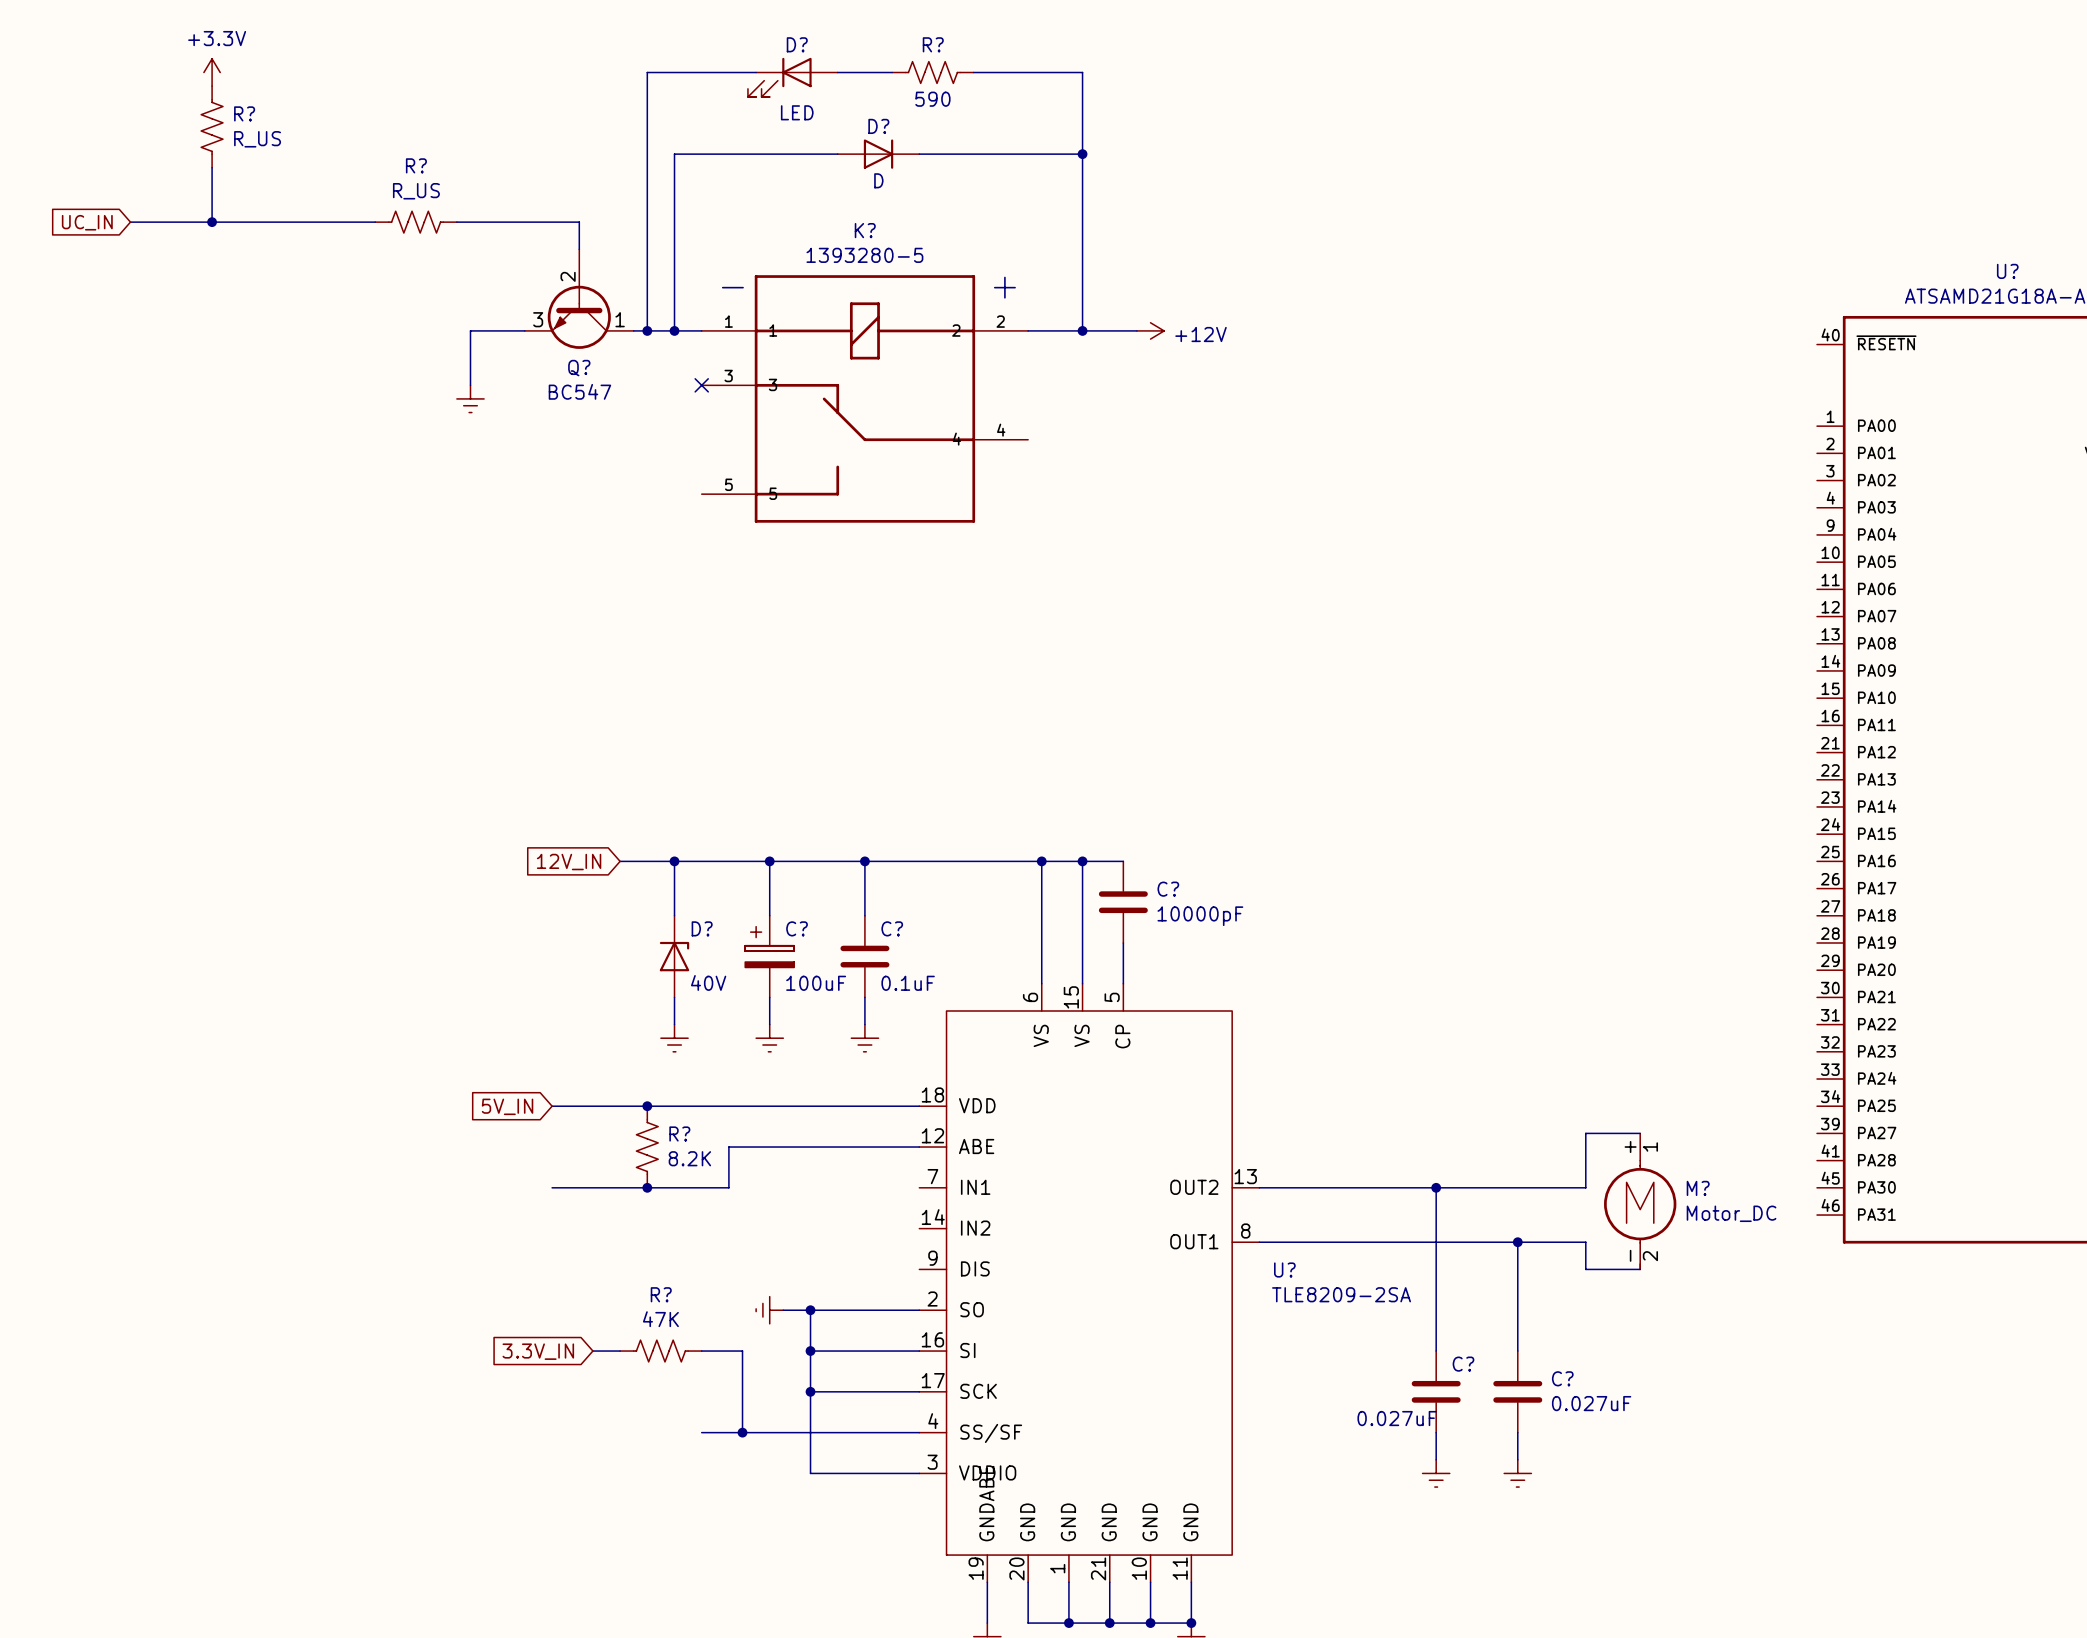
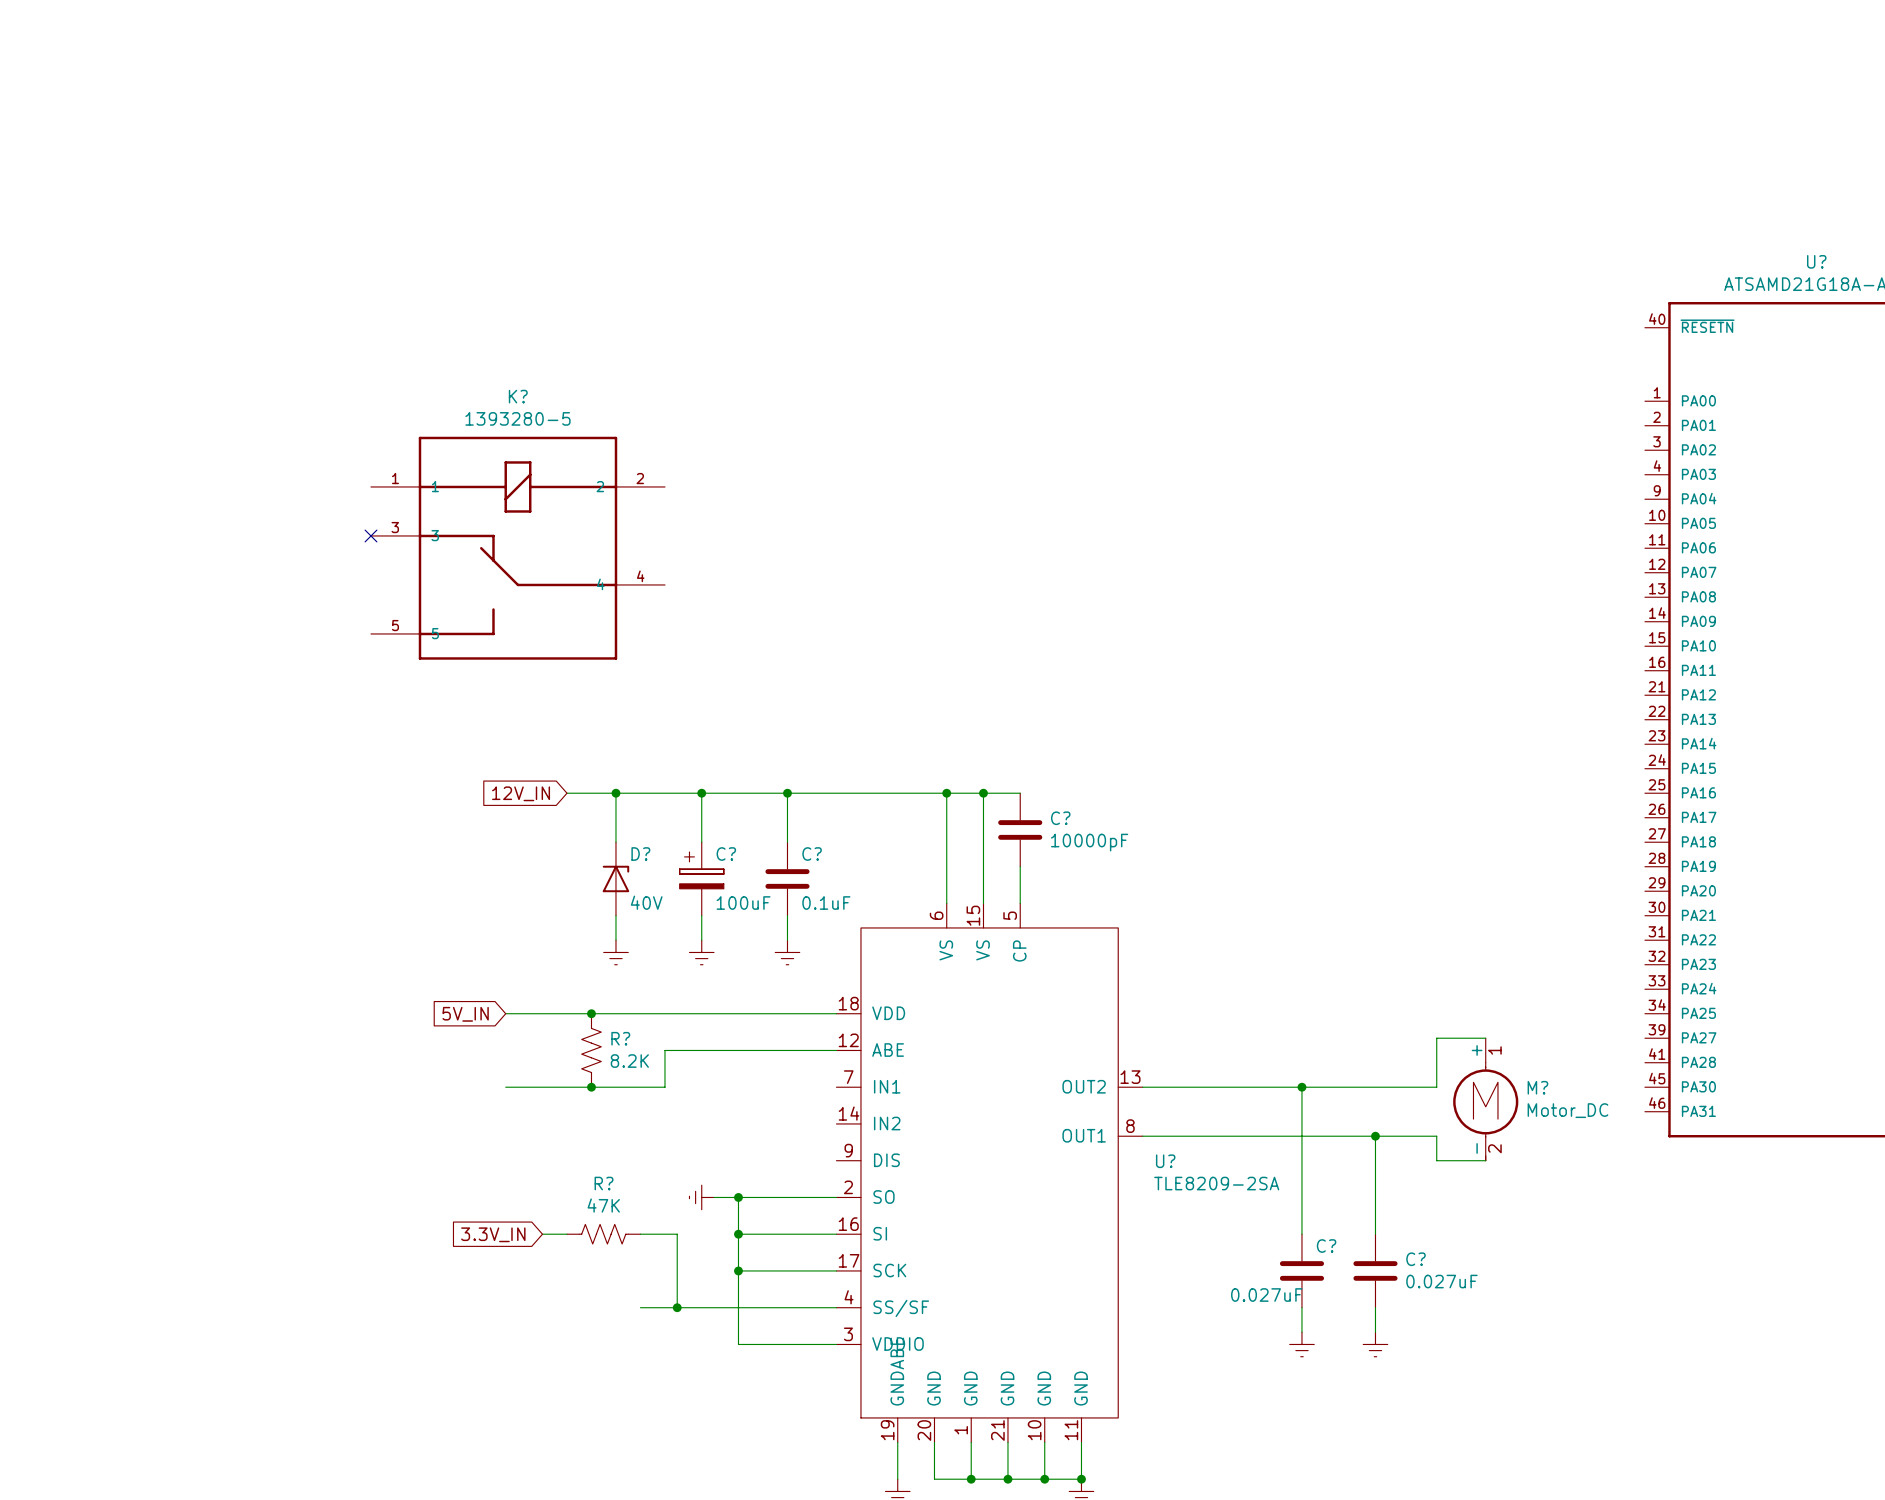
power symbol: +3.3V (212, 72) -> none
wire: (756, 72) (647, 72) (647, 330) -> none
wire: (837, 72) (892, 72) -> none
R?: 590 (932, 72) -> none
wire: (973, 72) (1082, 72) (1082, 330) -> none
D?: LED (792, 77) -> none
R?: R_US (212, 126) -> none
wire: (837, 154) (674, 154) (674, 330) -> none
D?: D (878, 154) -> none
wire: (919, 154) (1082, 154) -> none
junction: (1082, 154) -> none
wire: (212, 167) (212, 222) -> none
global label: UC_IN (87, 222) -> none
wire: (130, 222) (375, 222) -> none
junction: (212, 222) -> none
R?: R_US (416, 222) -> none
wire: (456, 222) (579, 222) (579, 249) -> none
text: - (732, 287) -> none
text: + (1004, 287) -> none
Q?: BC547 (579, 299) -> none
wire: (524, 330) (470, 330) (470, 385) -> none
wire: (633, 330) (701, 330) -> none
junction: (647, 330) -> none
junction: (674, 330) -> none
wire: (1028, 330) (1136, 330) -> none
junction: (1082, 330) -> none
power symbol: +12V (1150, 330) -> none
no-connect mark: (701, 385) -> none
power symbol: (470, 398) -> none
K?: 1393280-5 (864, 398) -> none
no-connect mark: none -> (370, 535)
K?: none -> 1393280-5 (517, 548)

